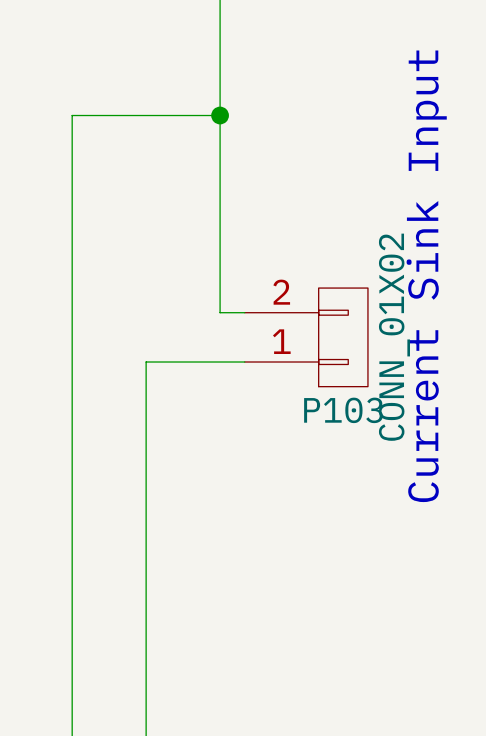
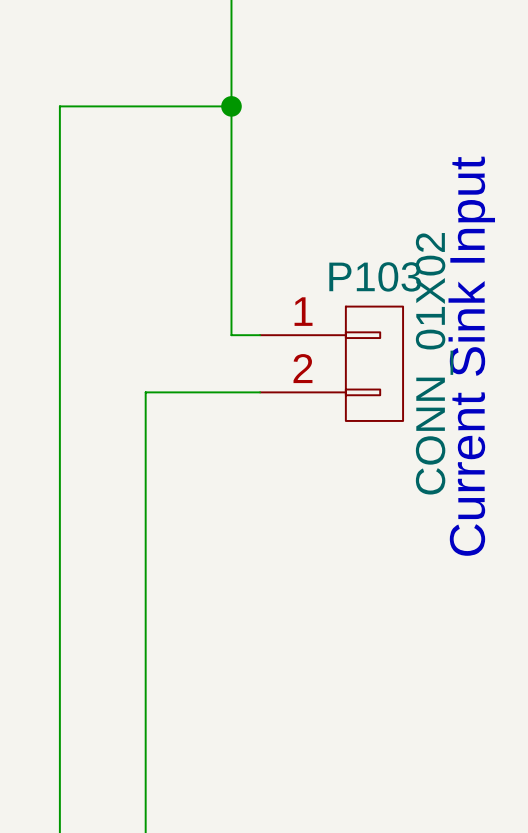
P103 flip: as is (343, 337) -> up-down (374, 363)

